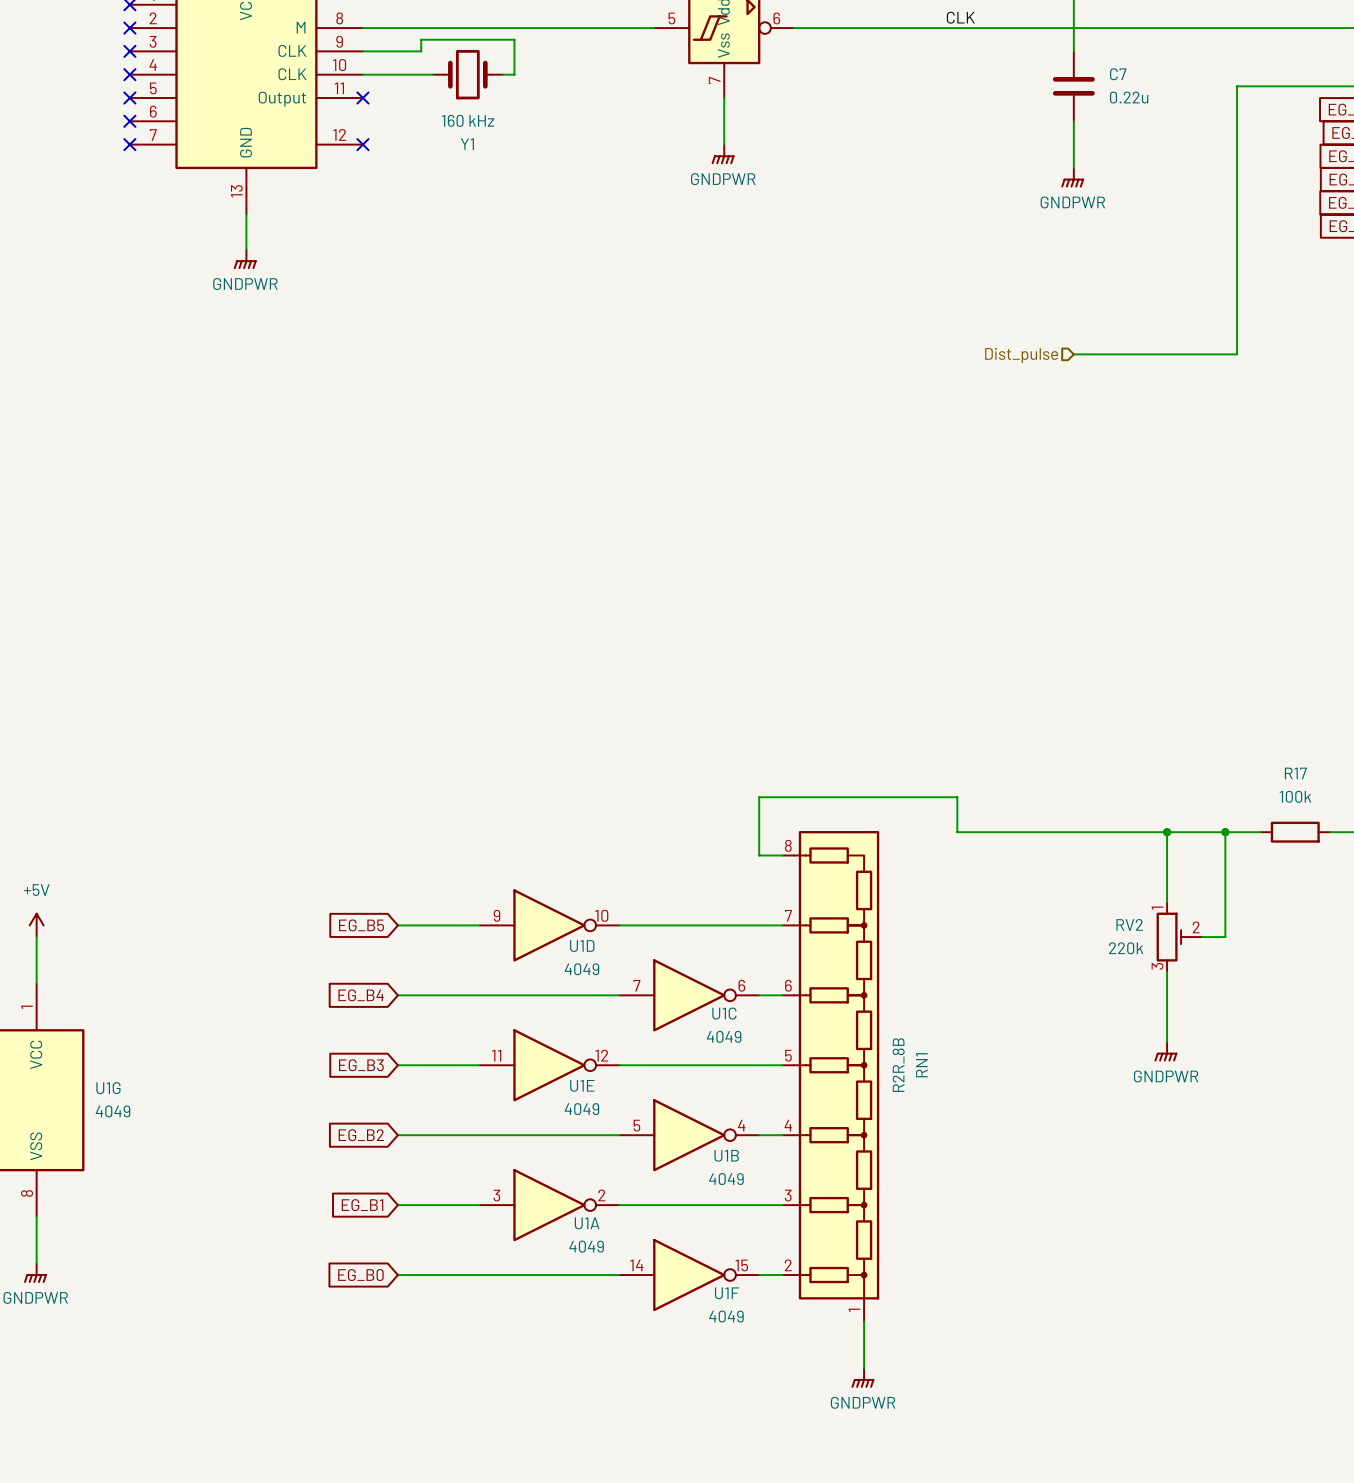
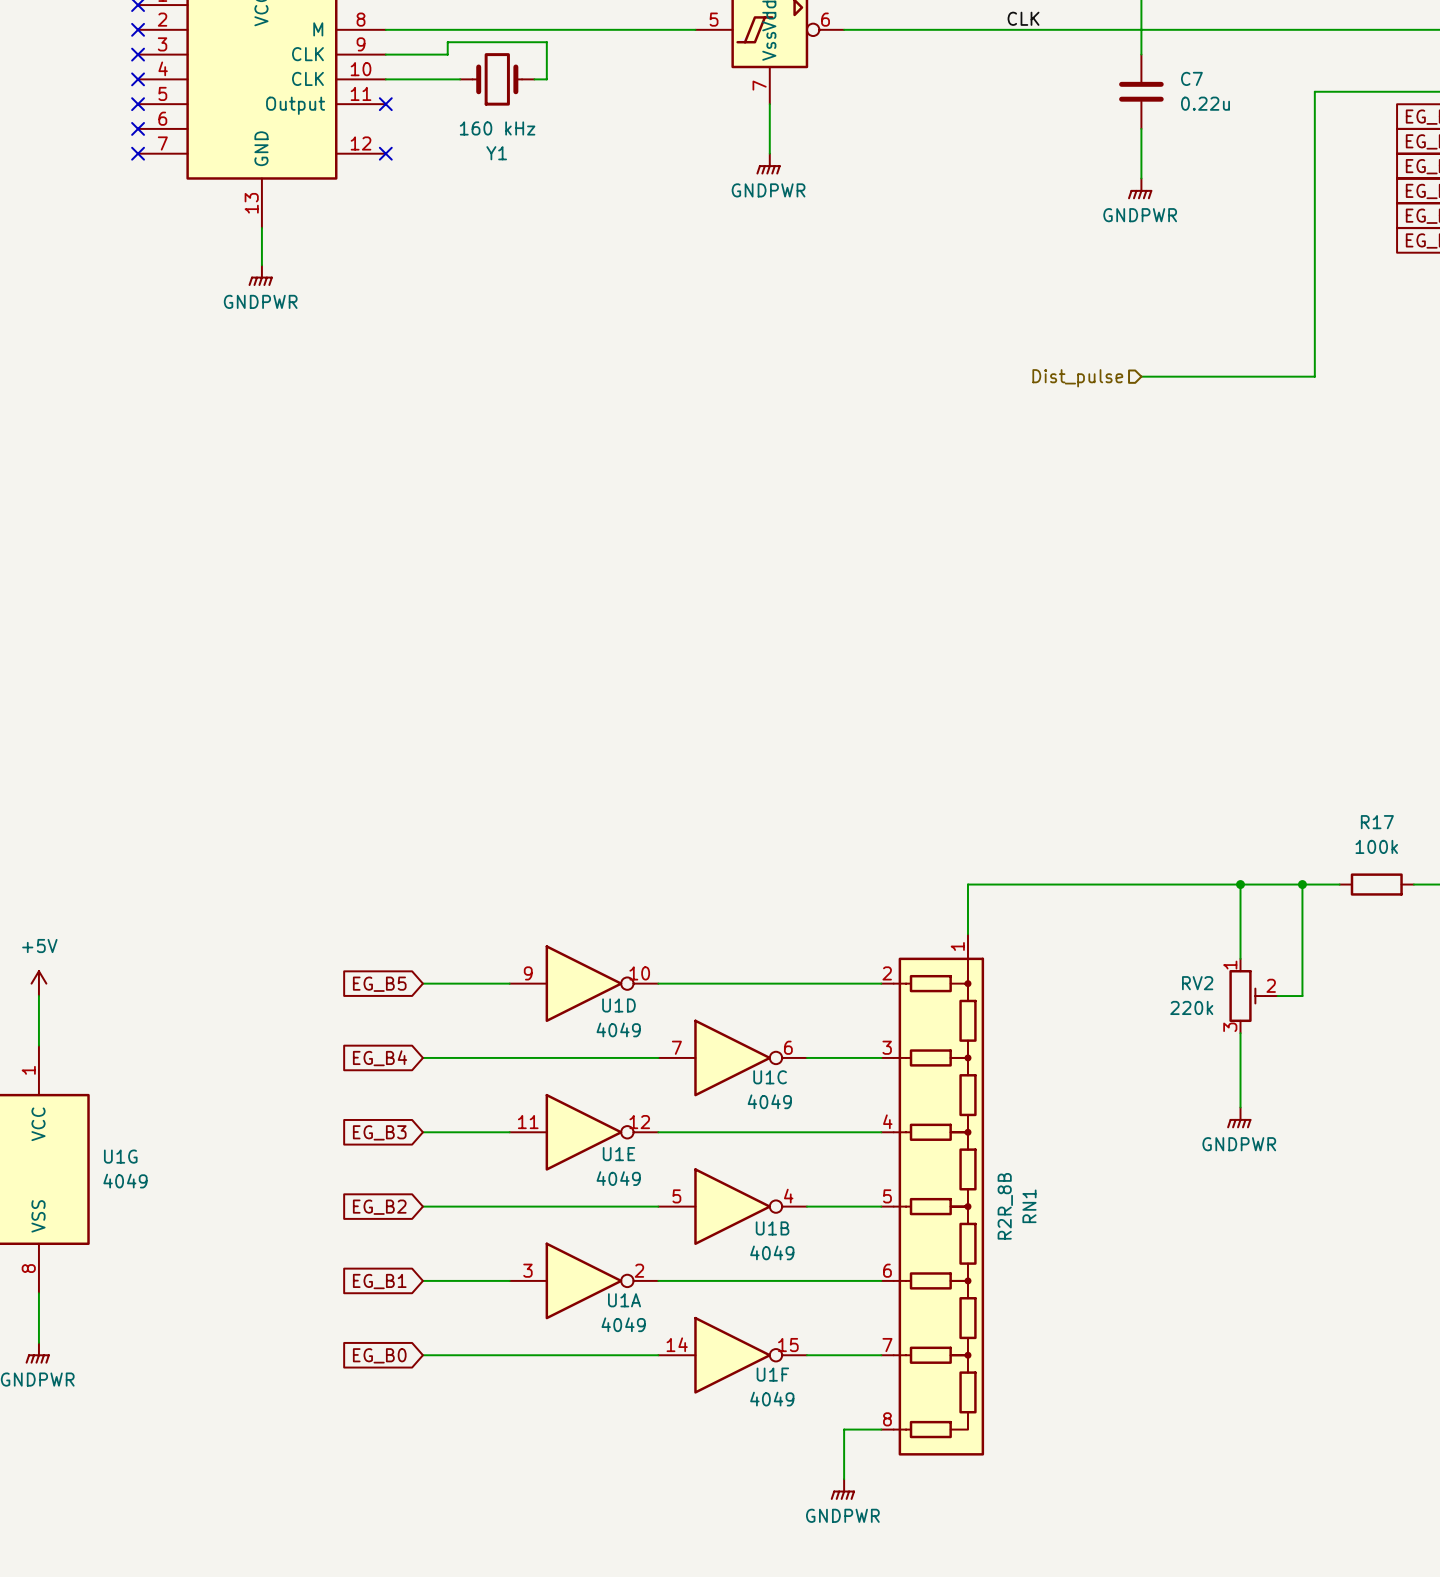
wire: (957, 832) (957, 797) (759, 797) (759, 855) (782, 855) -> (1017, 884) (967, 884) (967, 934)
RN1 flip: as is (836, 1065) -> up-down (938, 1206)
wire: none -> (881, 1429) (844, 1429) (844, 1479)
power symbol position: GNDPWR (862, 1378) -> GNDPWR (842, 1489)

